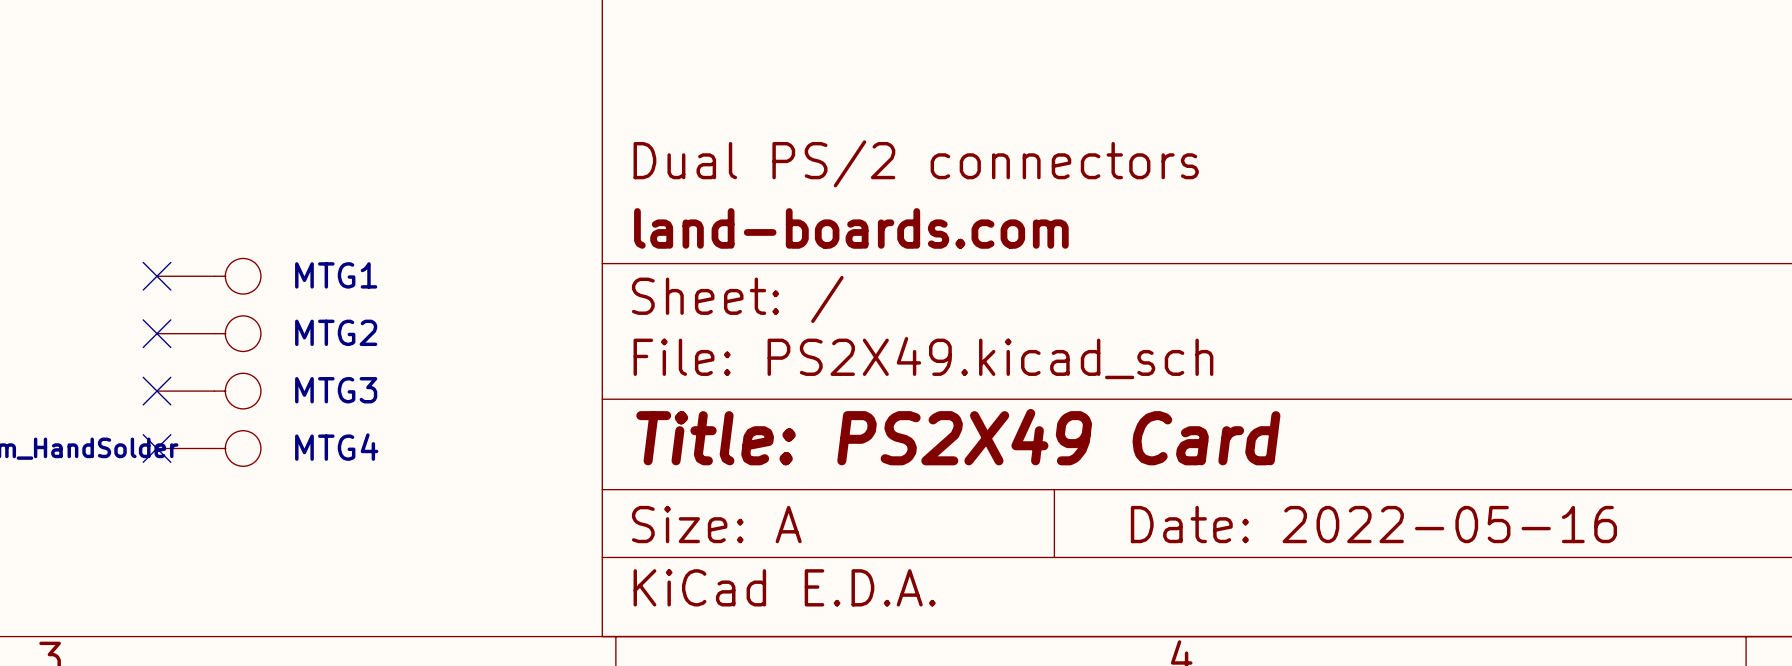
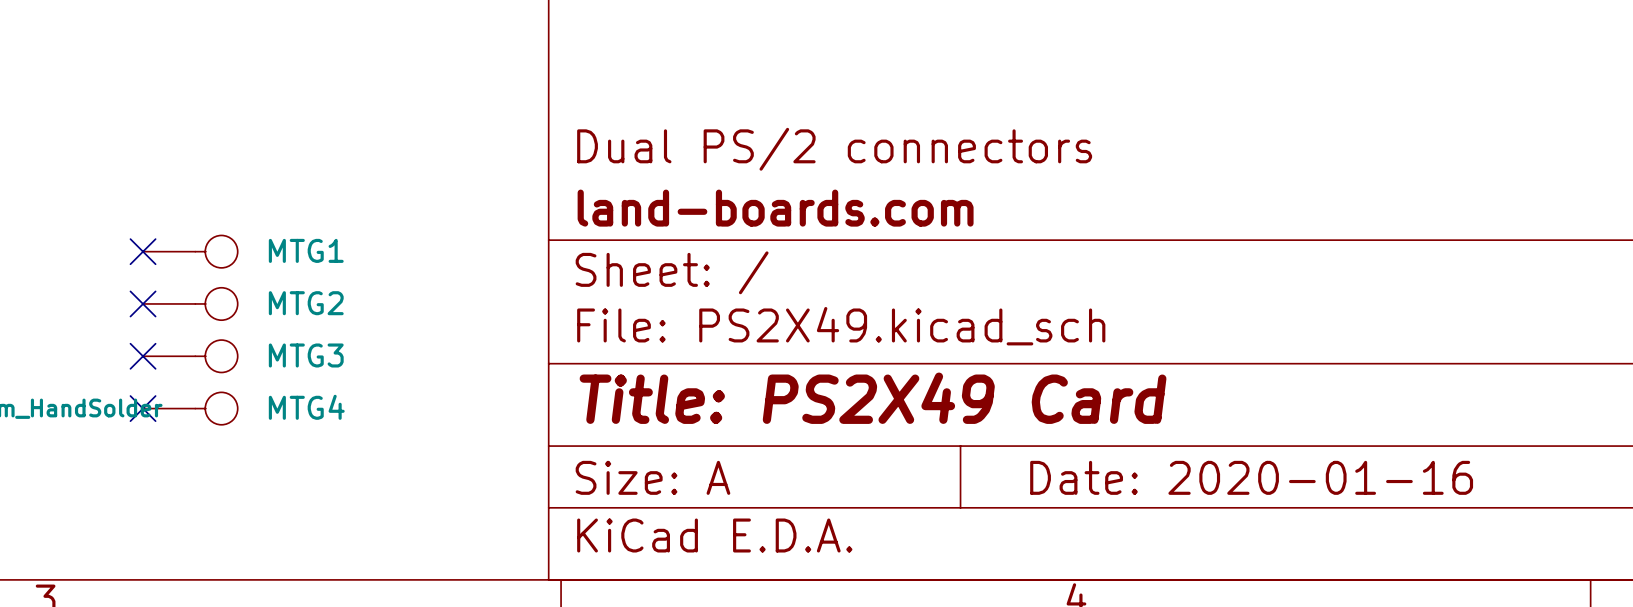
title block: Date: 2022-05-16 (1373, 524) -> Date: 2020-01-16 (1251, 477)

